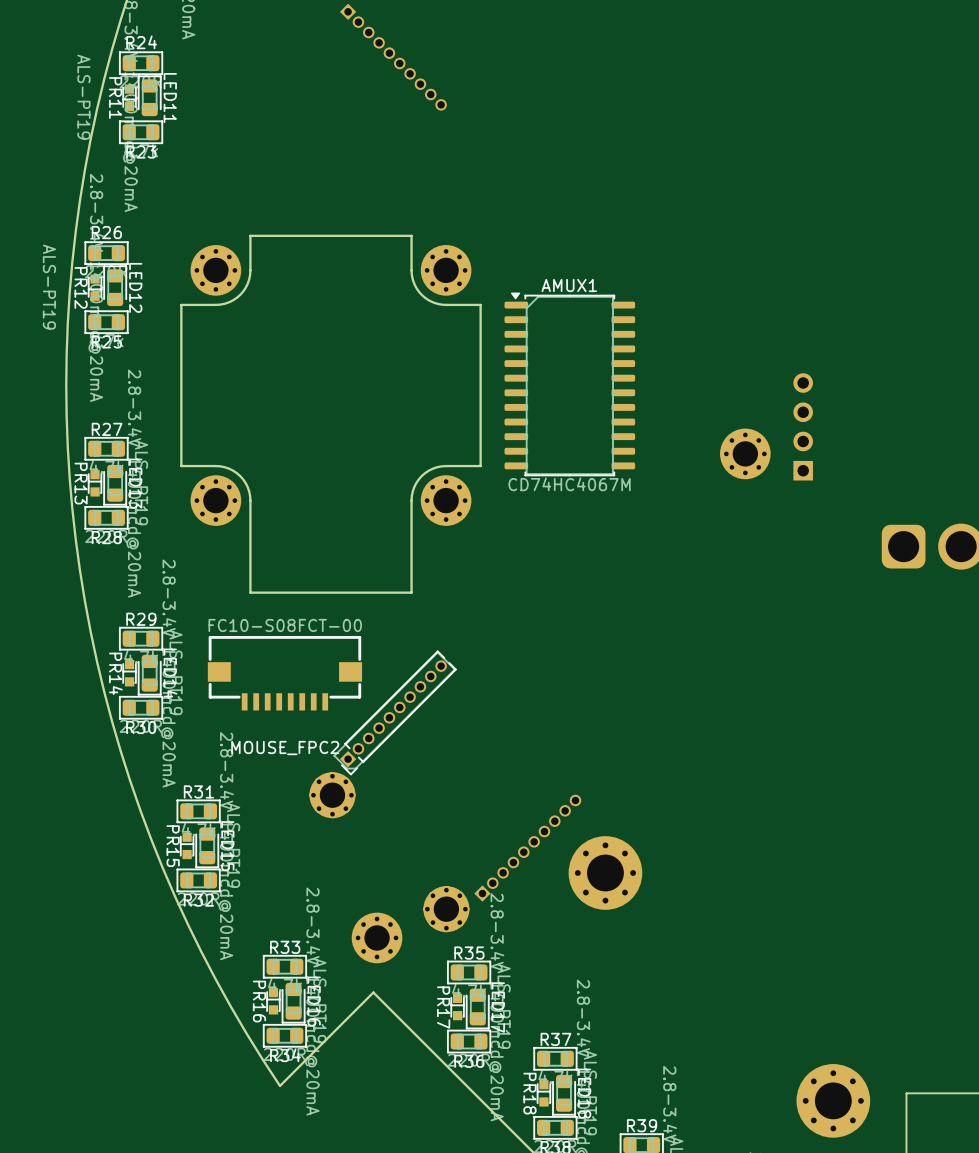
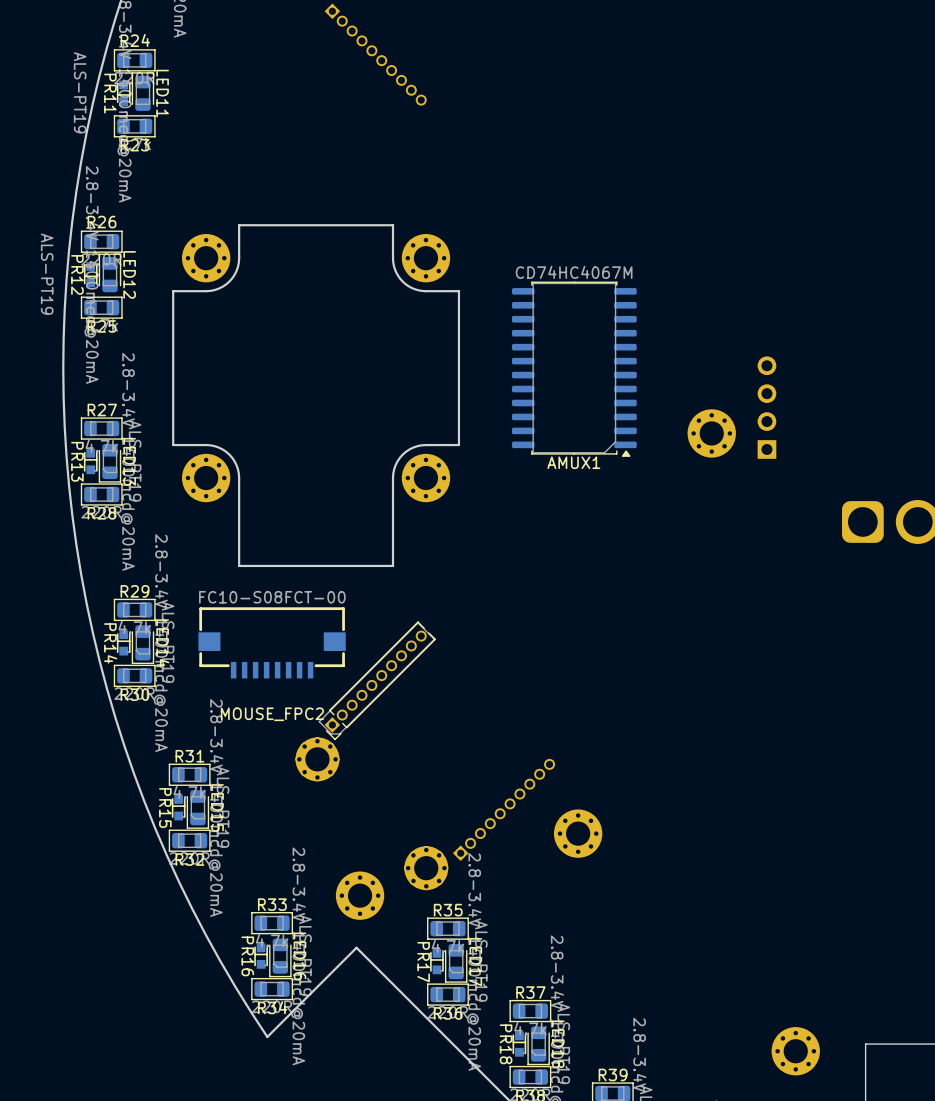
AMUX1 rotation: 0° (569, 384) -> 180° (574, 369)
part footprint: [568, 836, 643, 910] -> [553, 809, 603, 858]
part footprint: [796, 1064, 871, 1138] -> [771, 1027, 820, 1076]

